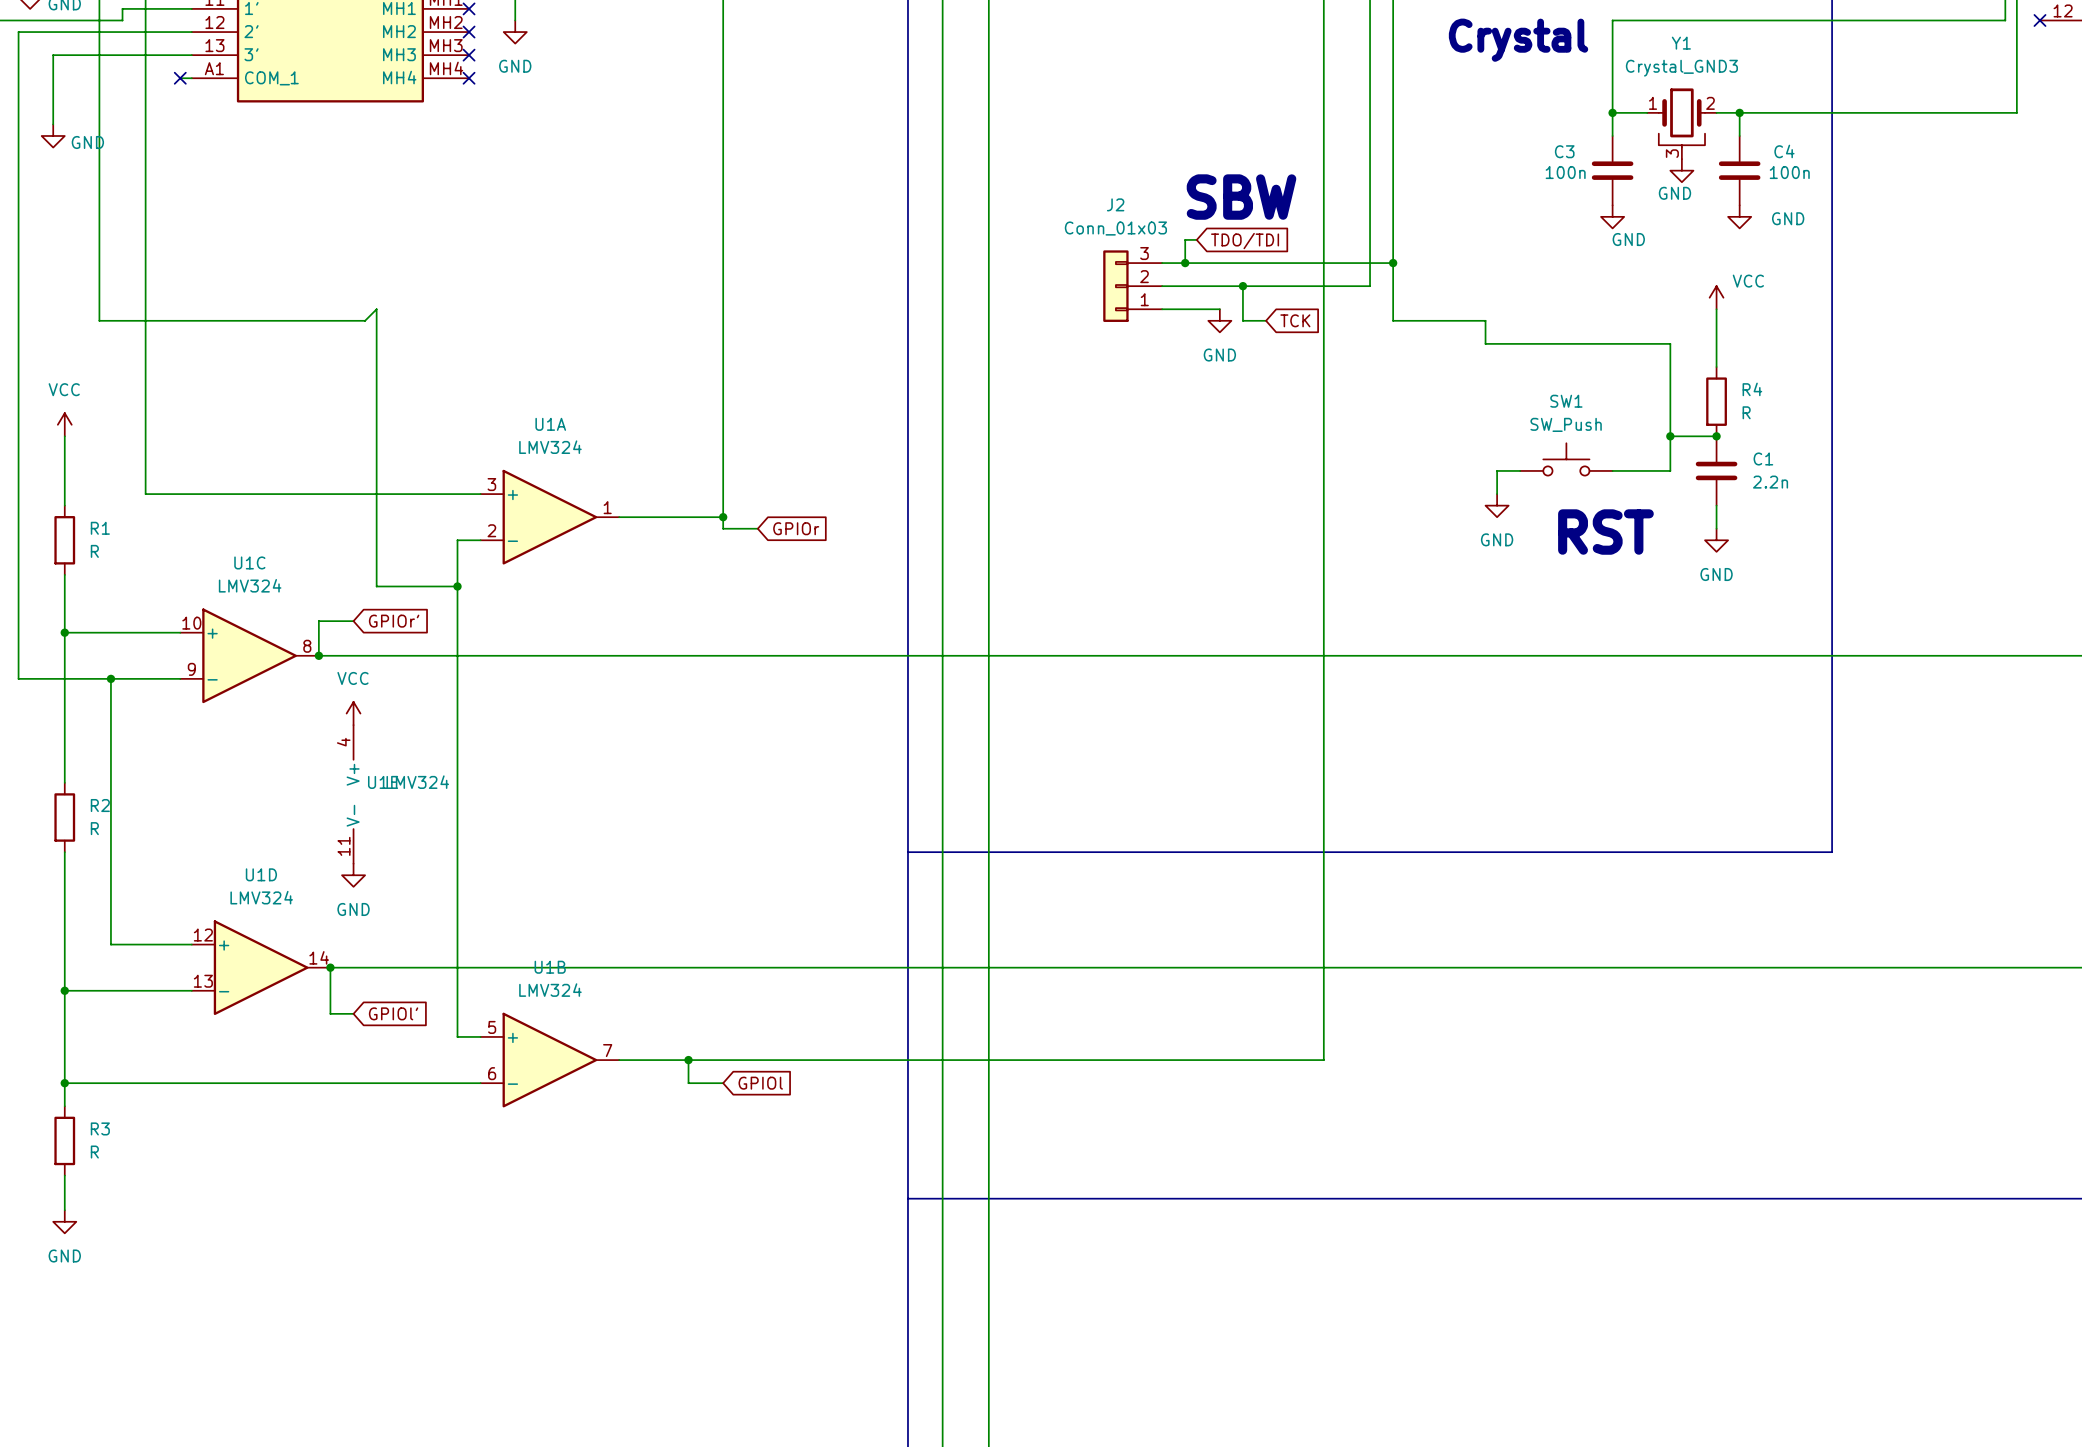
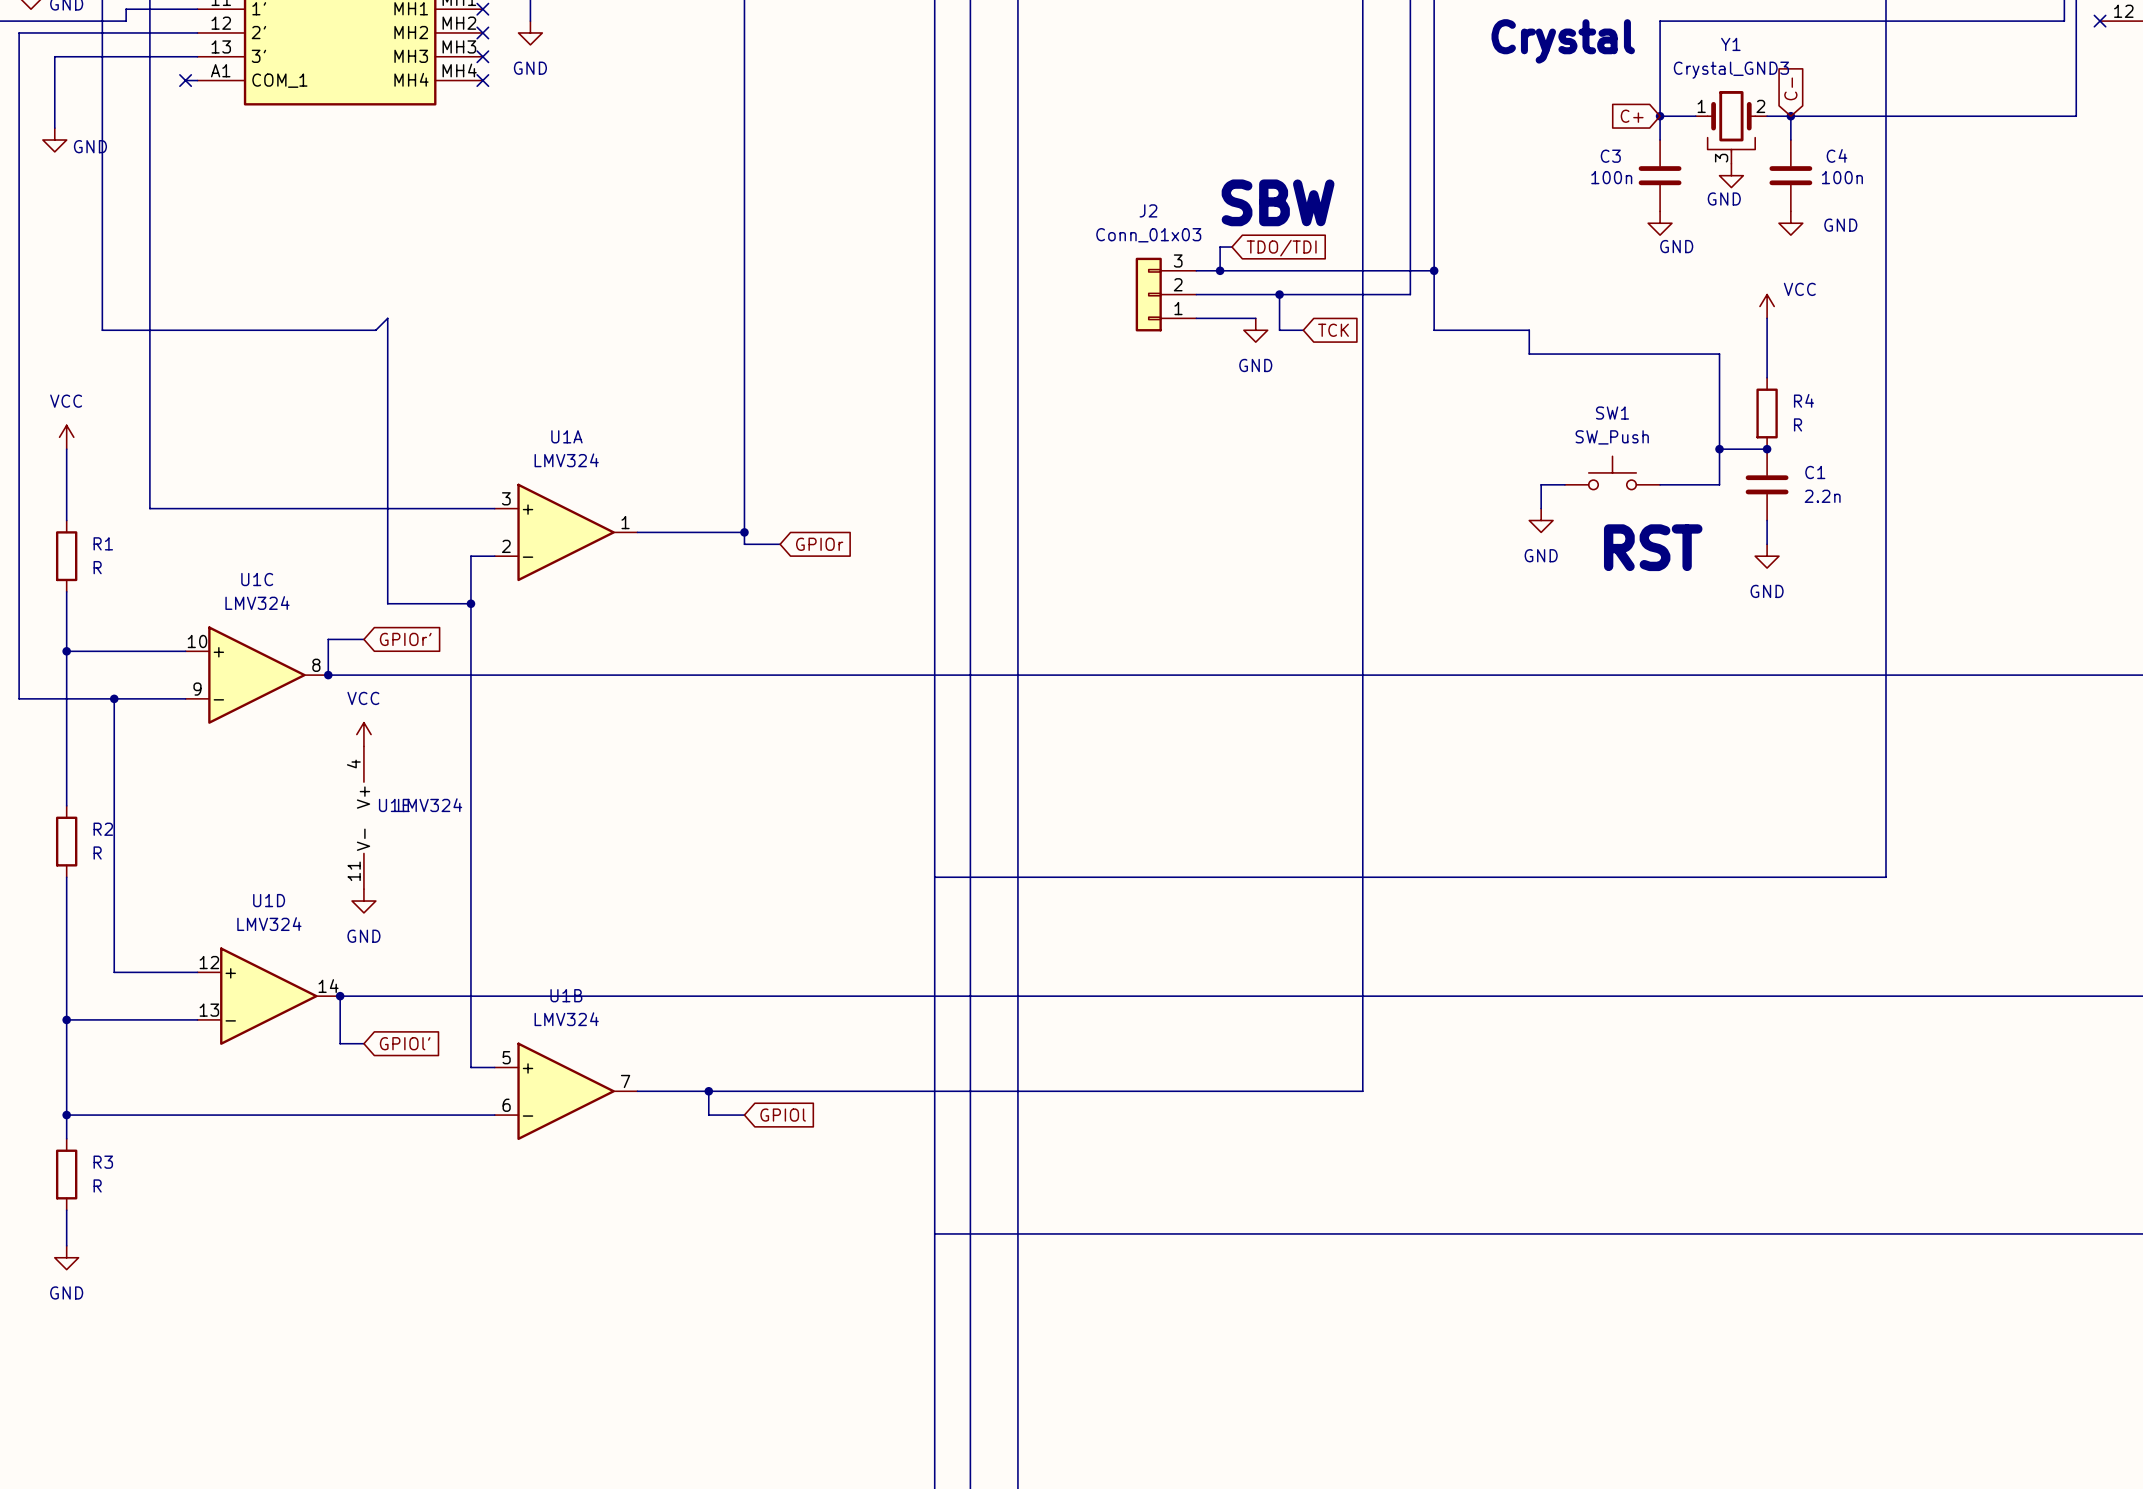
global label: none -> C- (1790, 88)
global label: none -> C+ (1632, 116)

